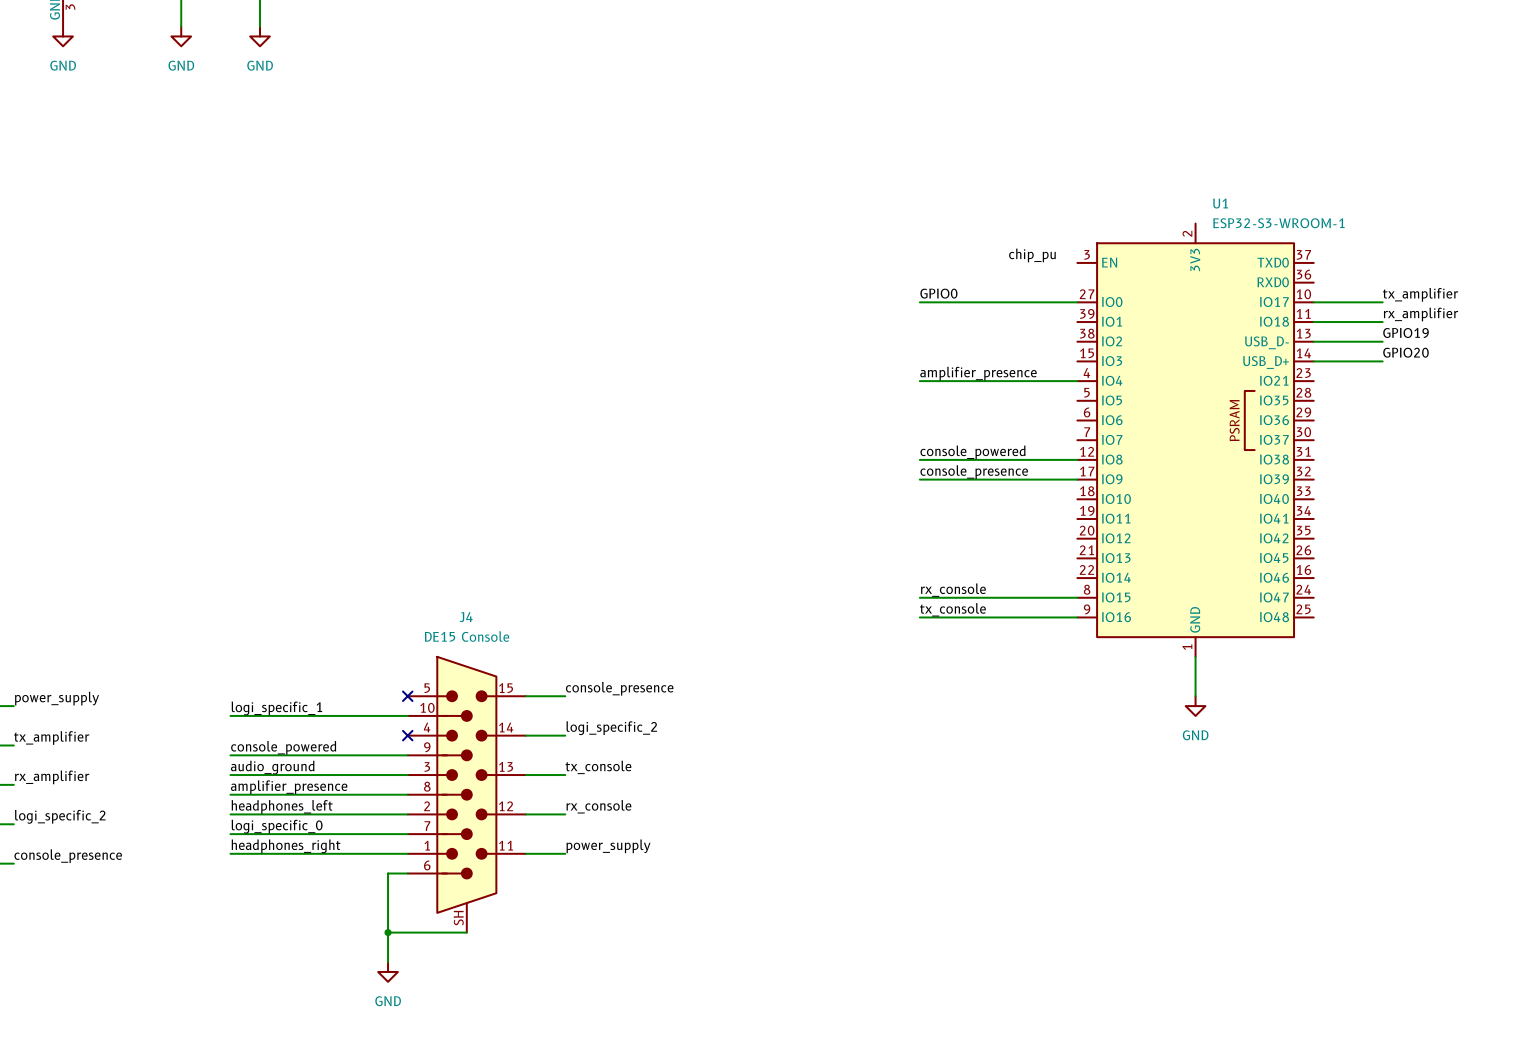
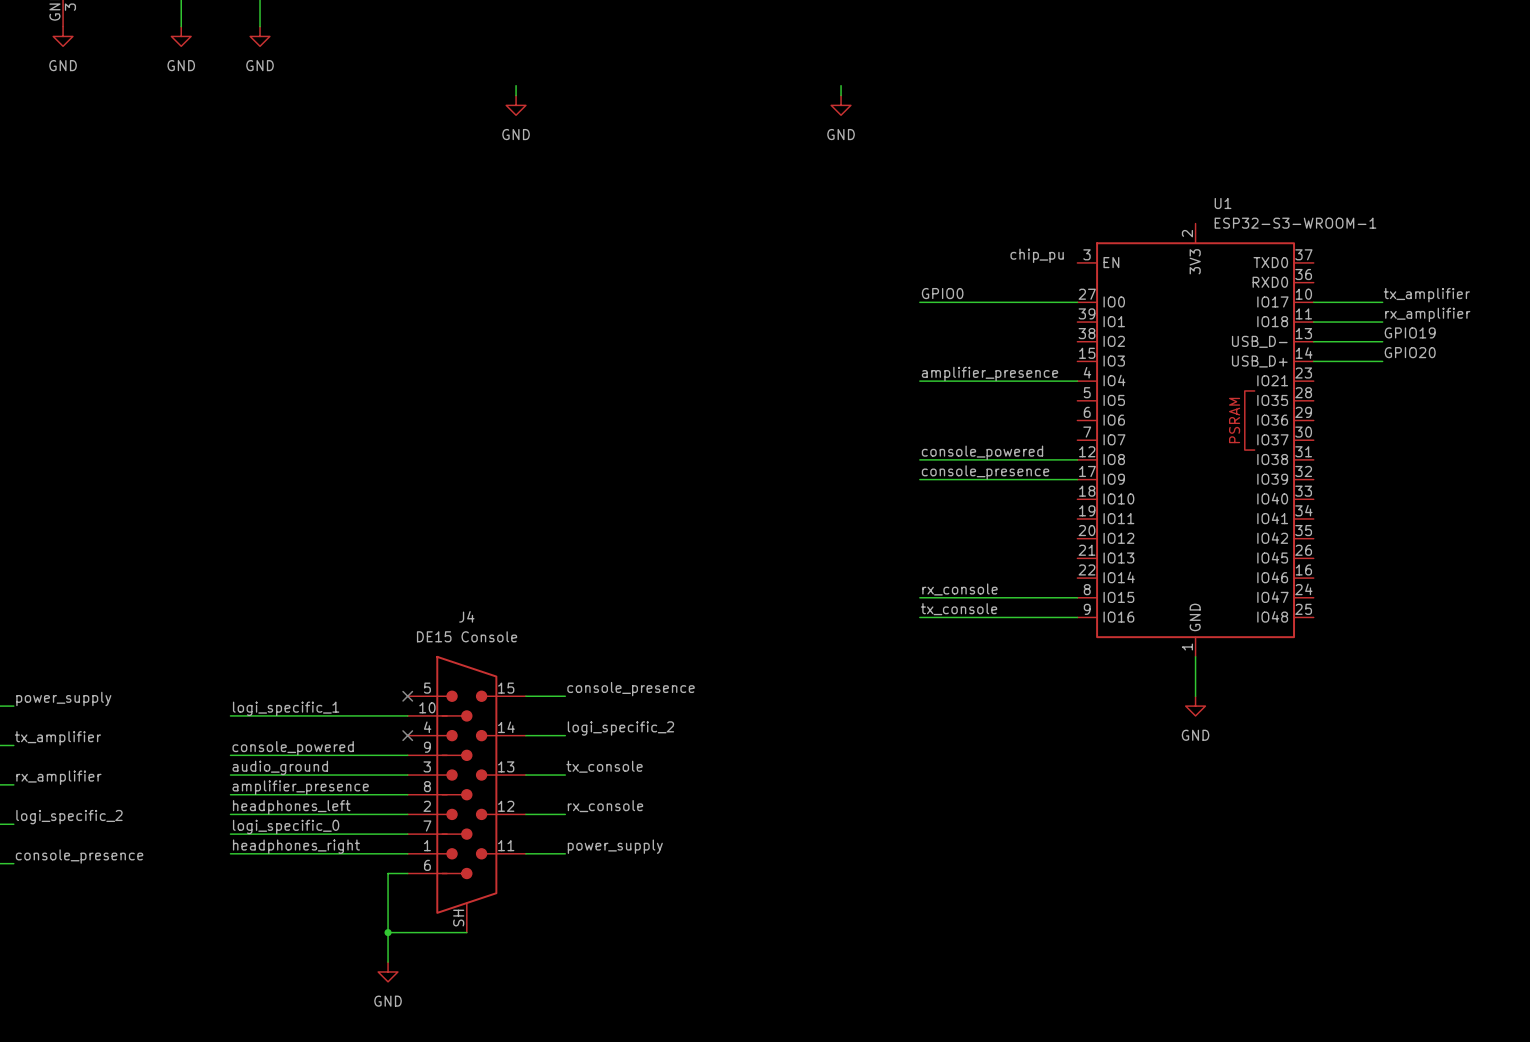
wire: none -> (516, 85) (516, 95)
wire: none -> (841, 85) (841, 95)
power symbol: none -> GND (516, 105)
power symbol: none -> GND (841, 105)

